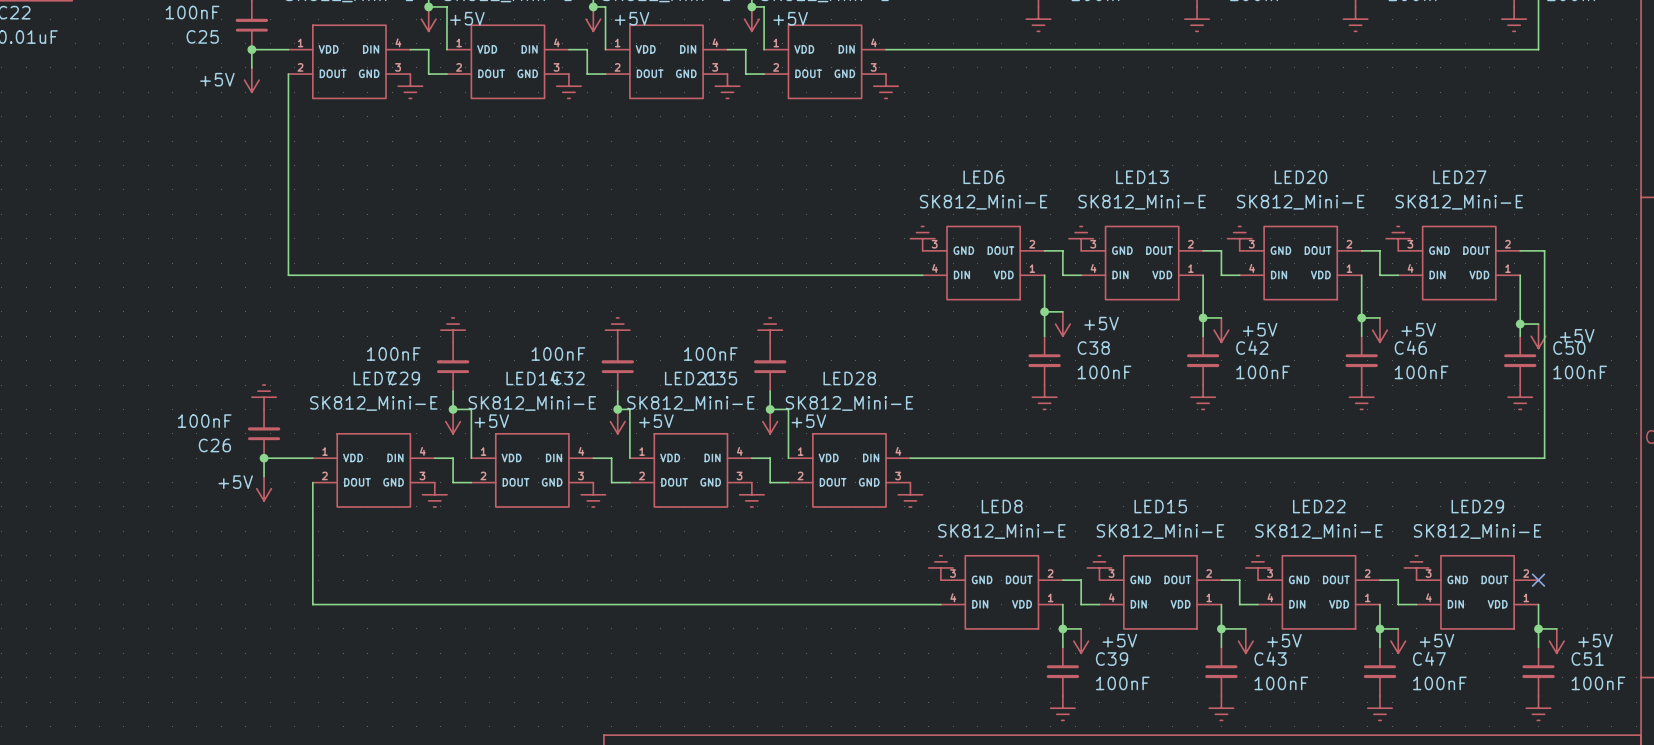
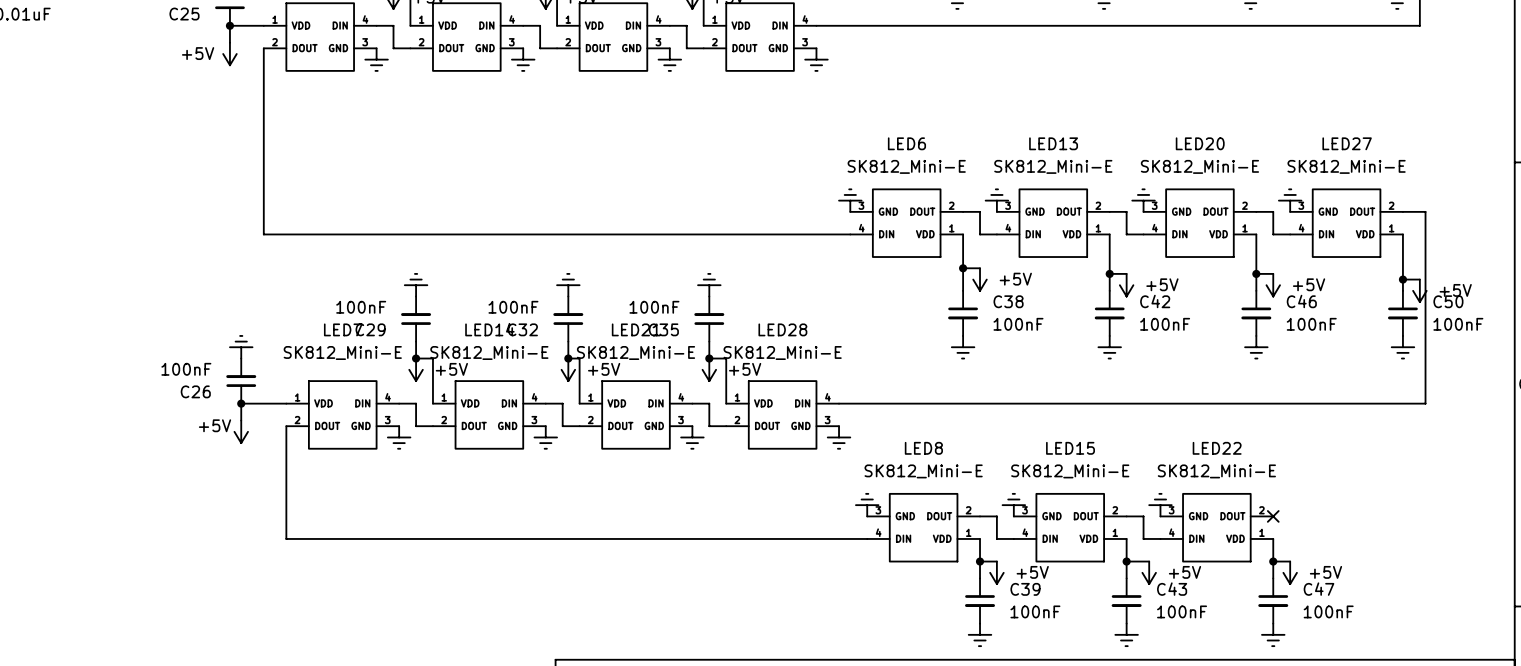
power symbol: (1416, 567) -> none
wire: (1379, 580) (1398, 580) (1398, 604) (1416, 604) -> none
no-connect mark: none -> (1273, 516)
no-connect mark: (1538, 580) -> none
LED29: SK812_Mini-E (1477, 592) -> none
wire: (1538, 604) (1538, 647) -> none
wire: (1538, 628) (1556, 628) -> none
junction: (1538, 628) -> none
power symbol: +5V (1556, 641) -> none
C51: 100nF (1538, 671) -> none
power symbol: (1538, 708) -> none

